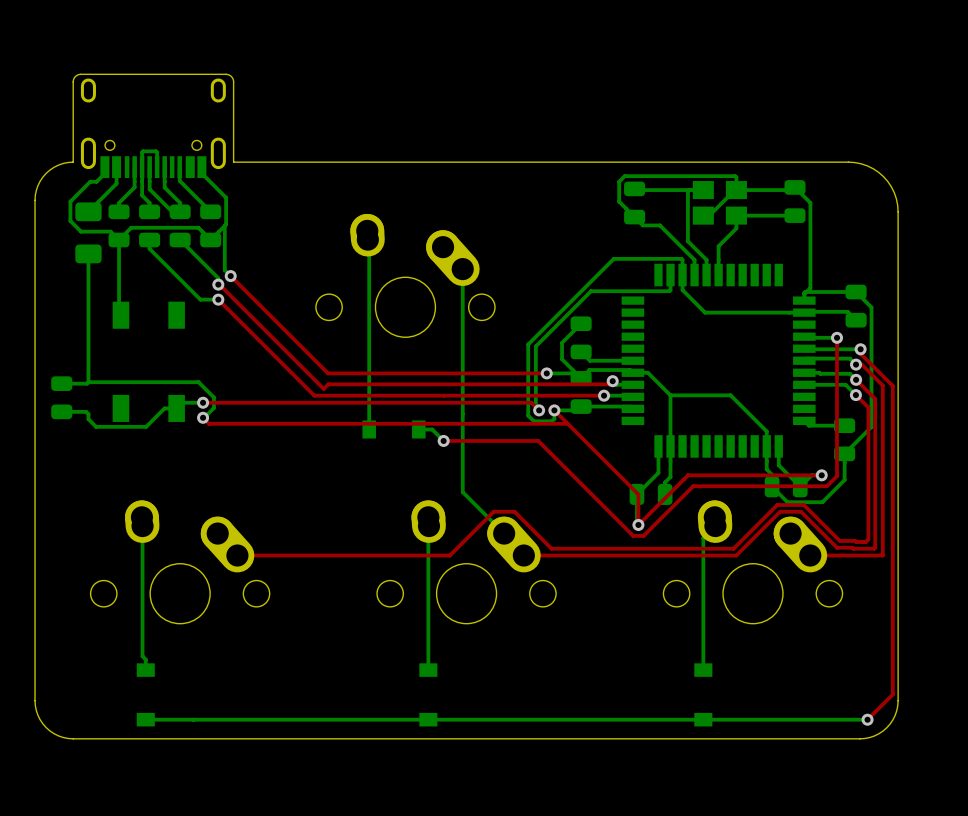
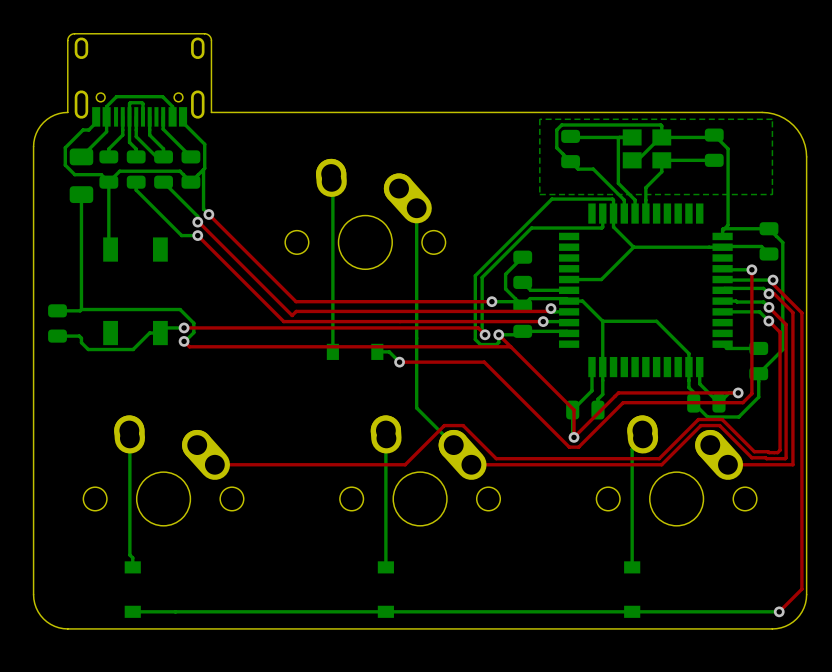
bottom track: none -> (106, 116) (106, 106) (116, 96) (162, 96) (172, 106) (172, 116)
bottom zone outline: none -> (539, 119) (539, 194) (772, 194) (772, 119) (539, 119)
bottom track: none -> (633, 247) (601, 279) (569, 279)

